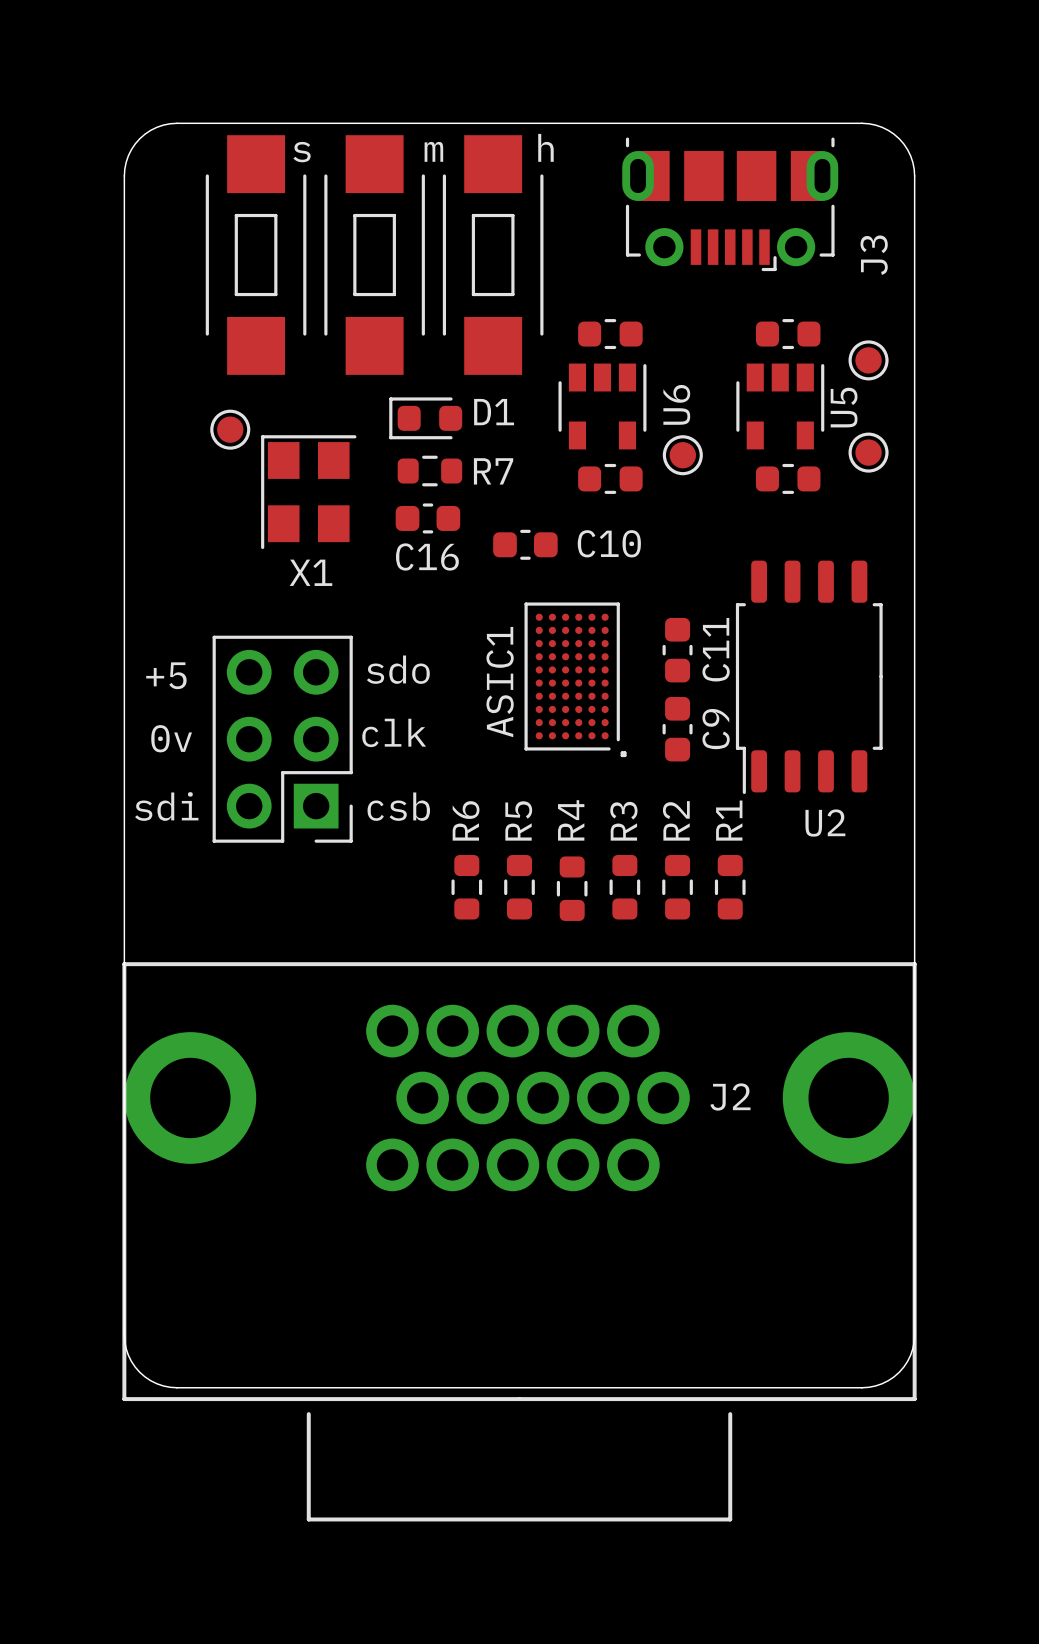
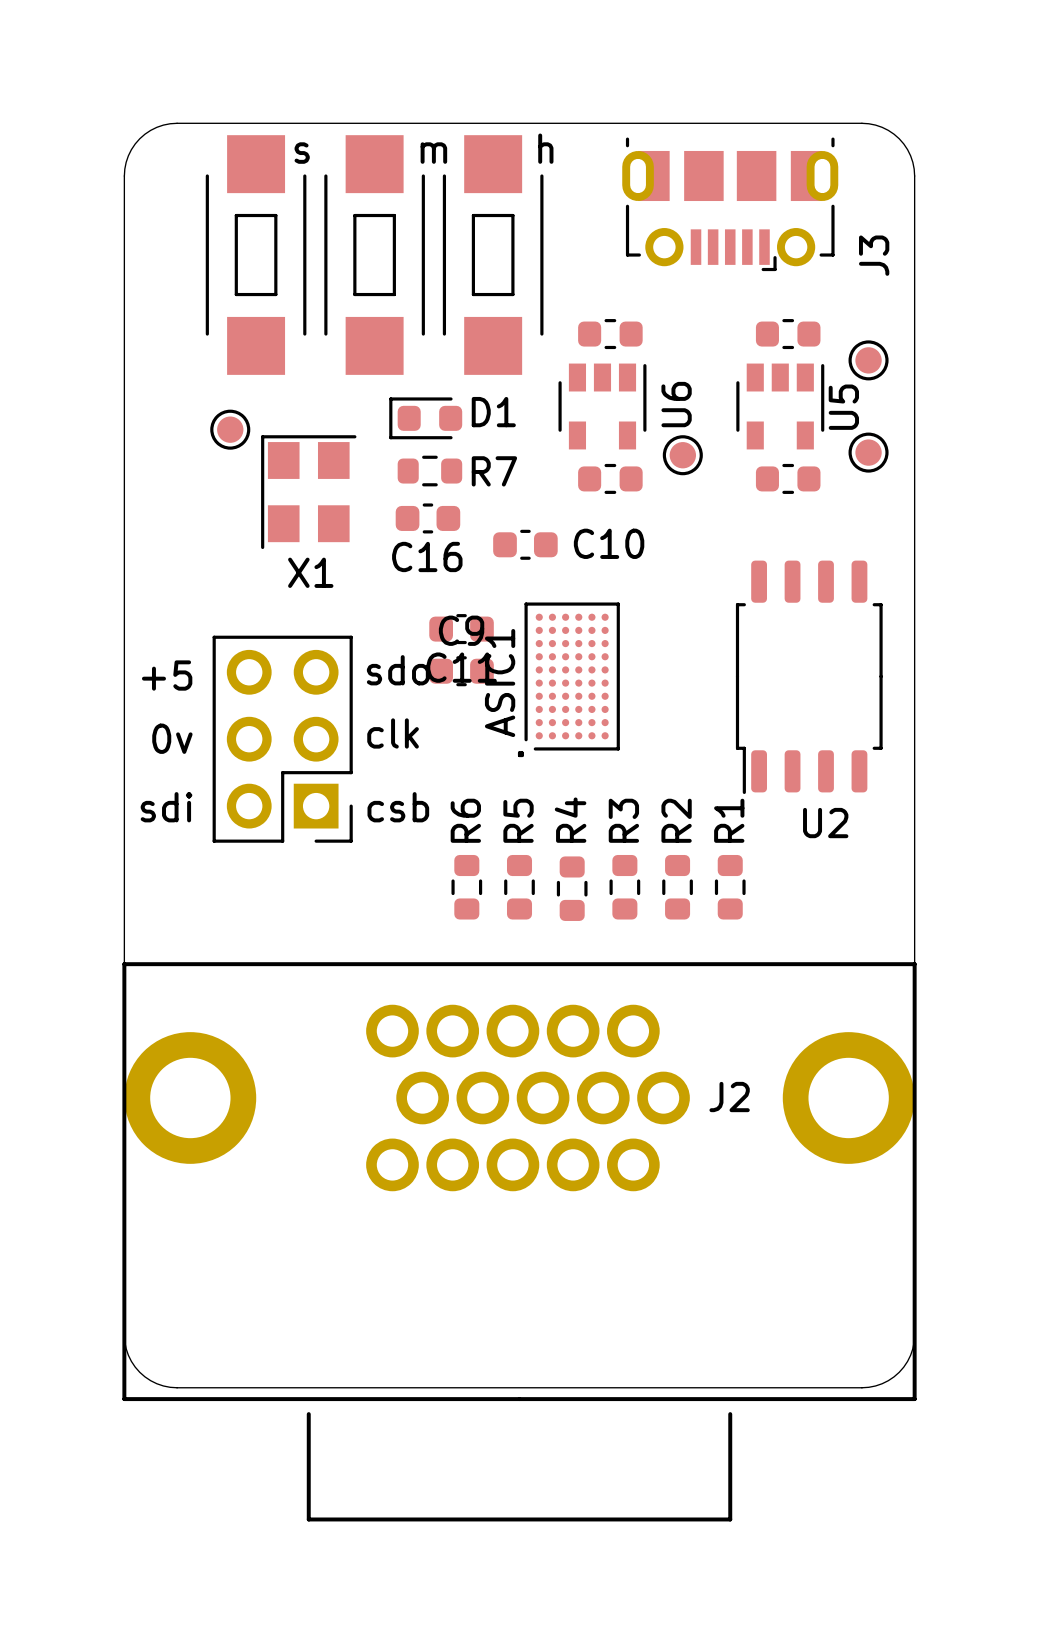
ASIC1 footprint: [524, 602, 627, 758] -> [517, 602, 620, 758]
C11 rotation: 0° (677, 650) -> 90° clockwise (461, 629)
C11 position: (677, 650) -> (461, 629)
C9 rotation: 0° (677, 729) -> 90° clockwise (461, 671)
C9 position: (677, 729) -> (461, 671)
C9 name position: C9 (716, 729) -> C9 (461, 630)

